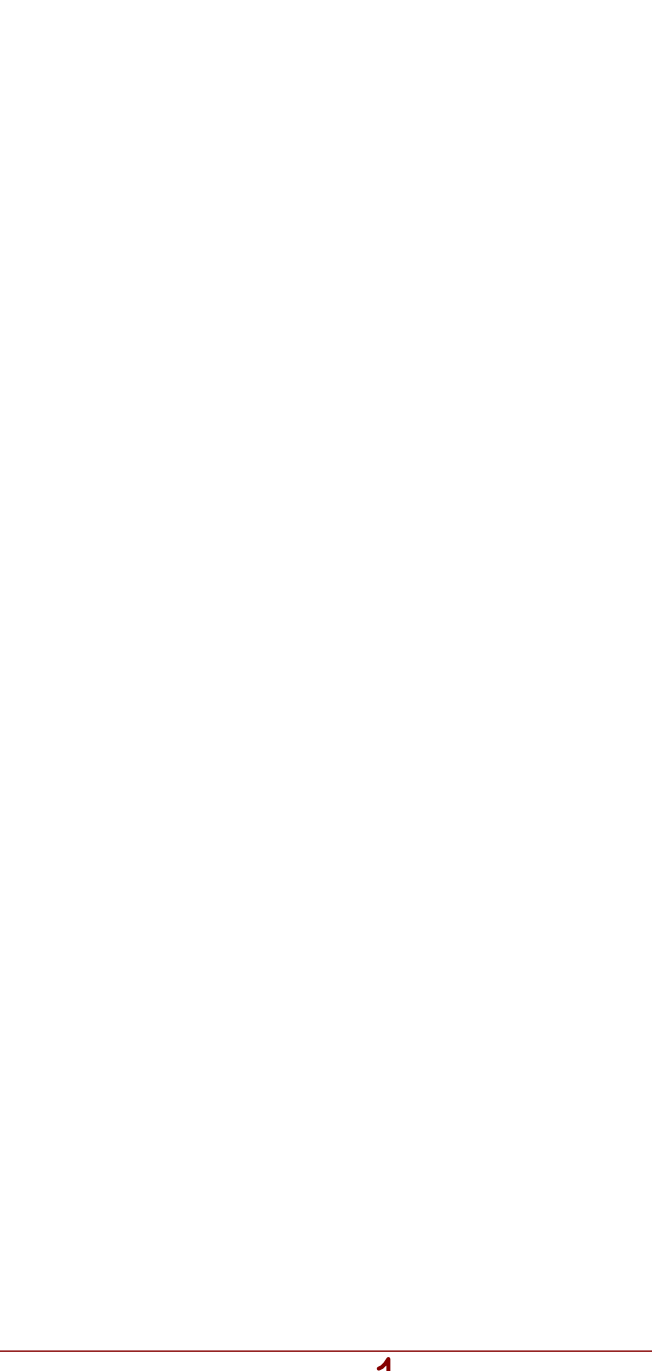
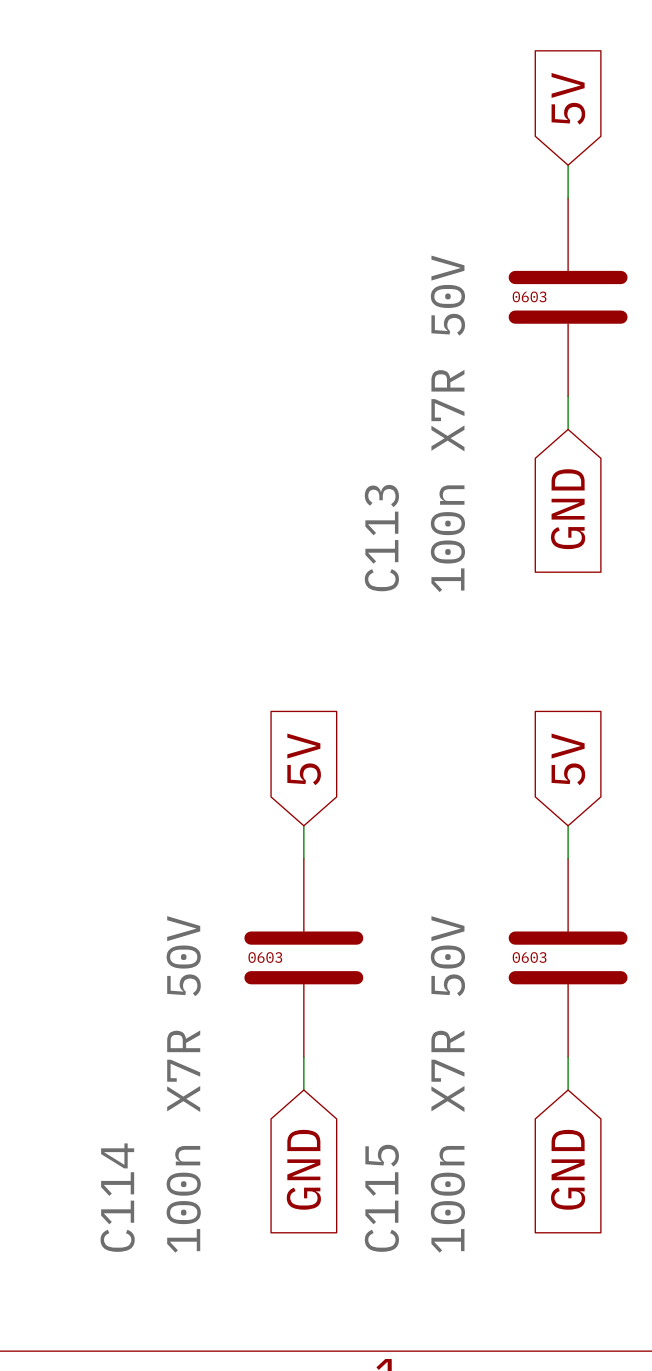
global label: none -> 5V (568, 98)
wire: none -> (568, 165) (568, 198)
C113: none -> 100n X7R 50V (568, 297)
wire: none -> (568, 396) (568, 429)
global label: none -> GND (568, 509)
global label: none -> 5V (304, 759)
global label: none -> 5V (568, 759)
wire: none -> (303, 825) (303, 858)
wire: none -> (568, 825) (568, 858)
C114: none -> 100n X7R 50V (303, 957)
C115: none -> 100n X7R 50V (568, 957)
wire: none -> (303, 1057) (303, 1090)
wire: none -> (568, 1057) (568, 1090)
global label: none -> GND (303, 1169)
global label: none -> GND (568, 1169)

